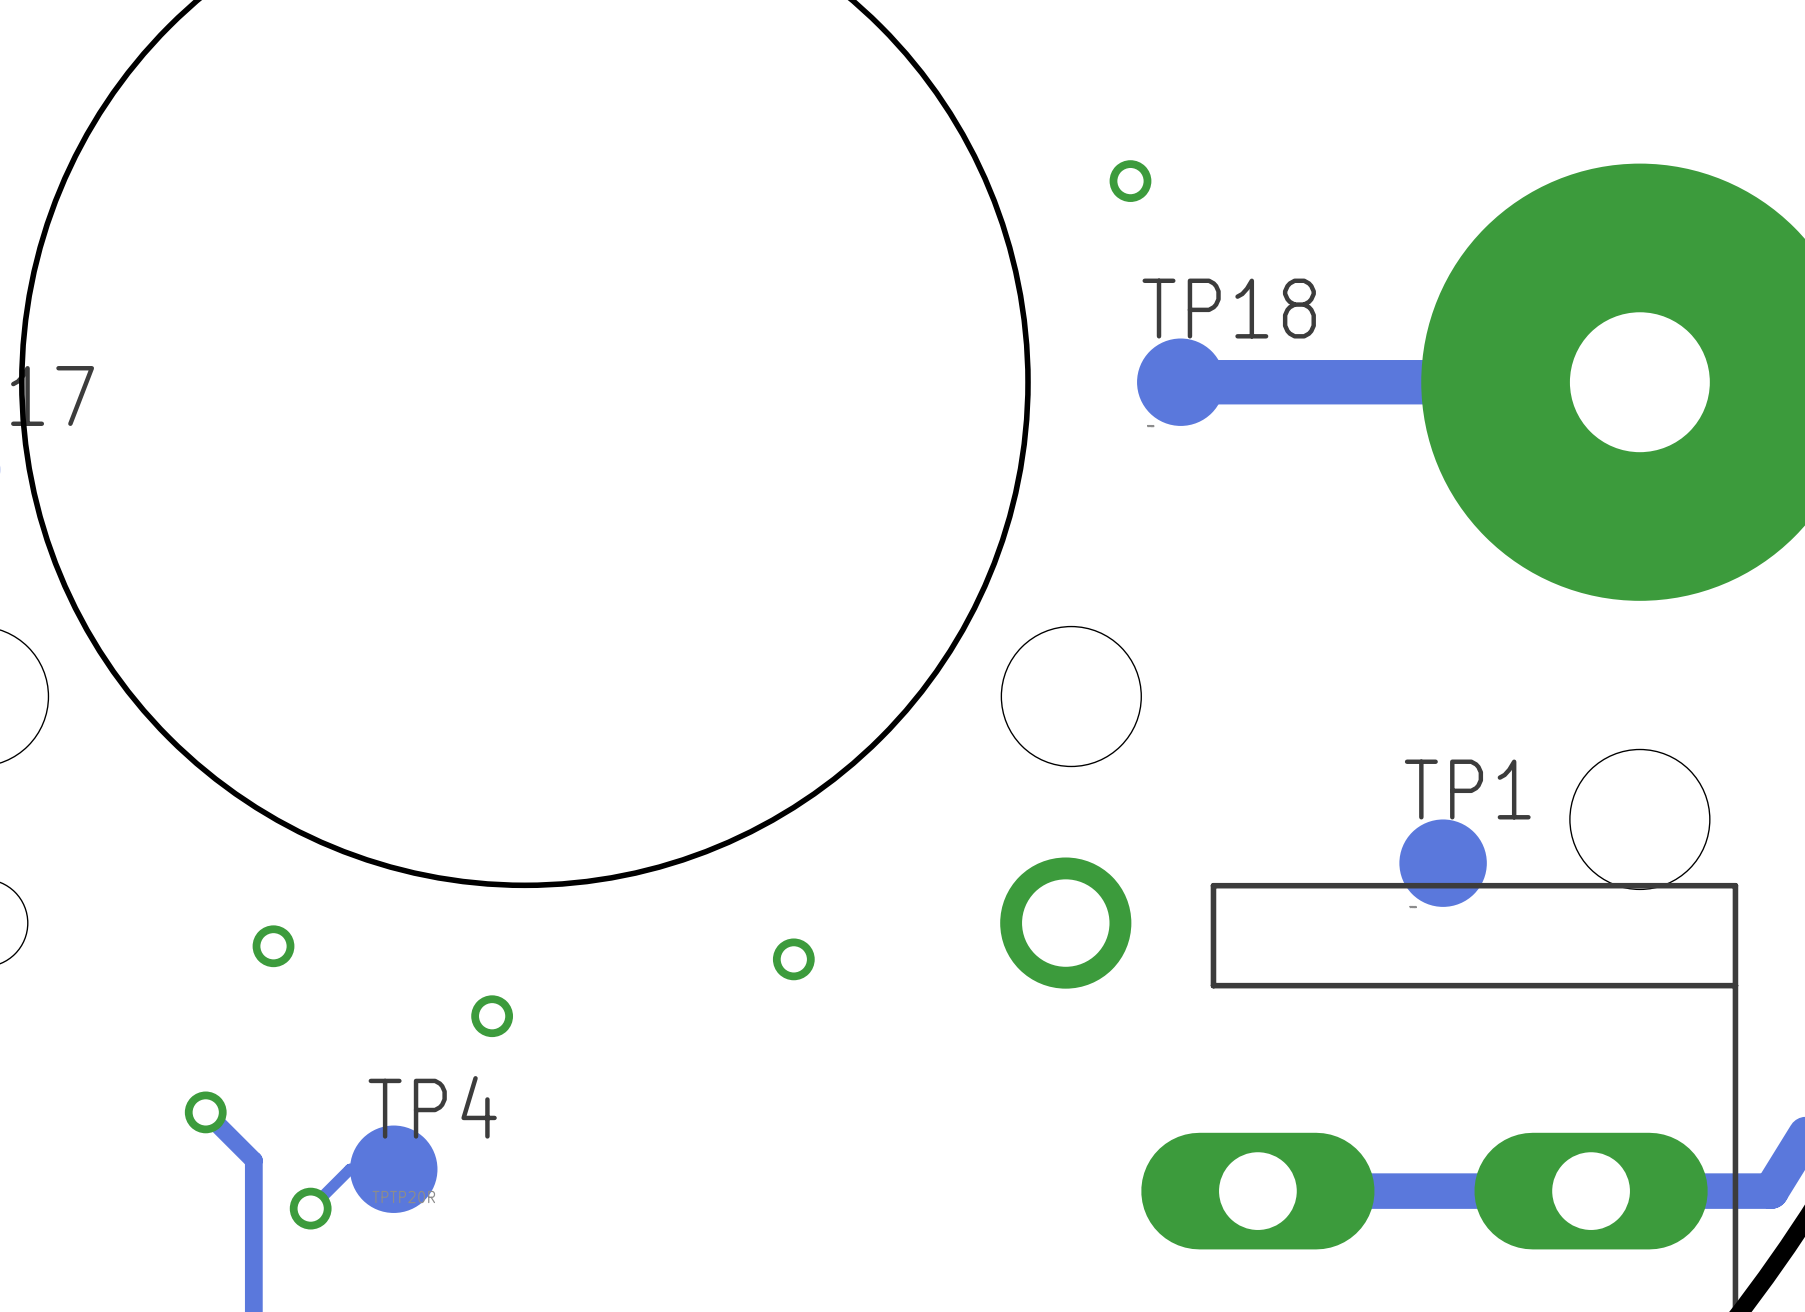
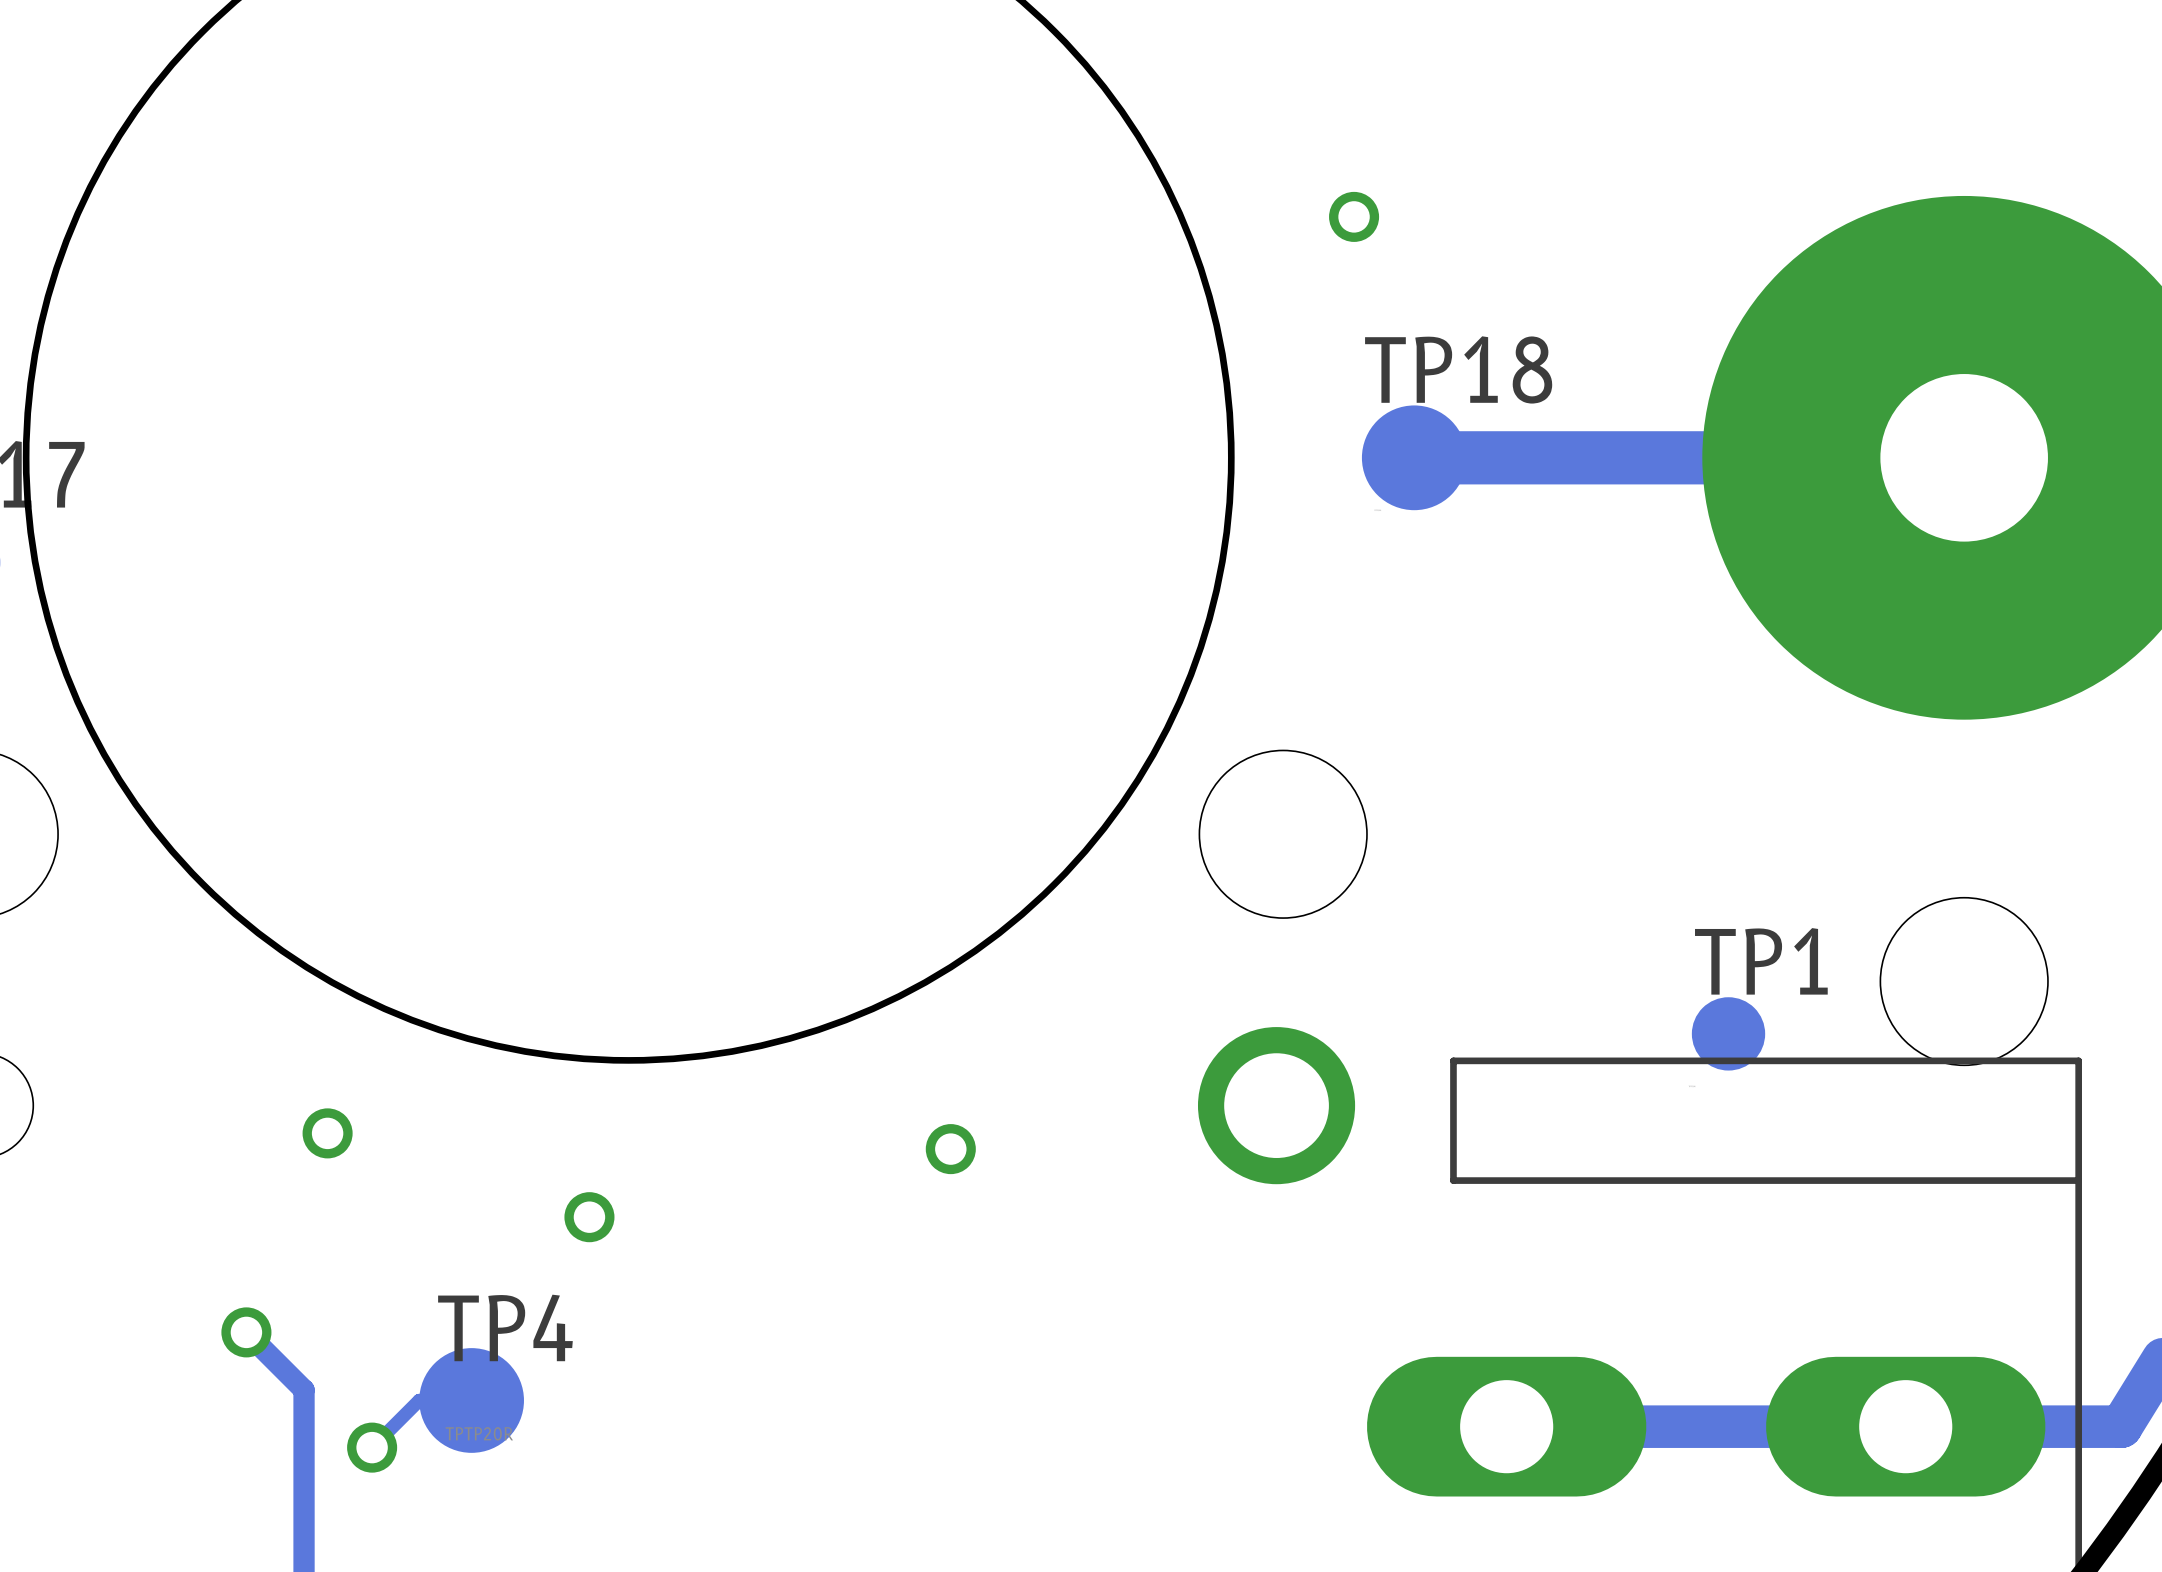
TP1 name position: TP1 (1467, 789) -> TP1 (1761, 961)
TP1 footprint: [1399, 819, 1487, 907] -> [1691, 997, 1766, 1071]

